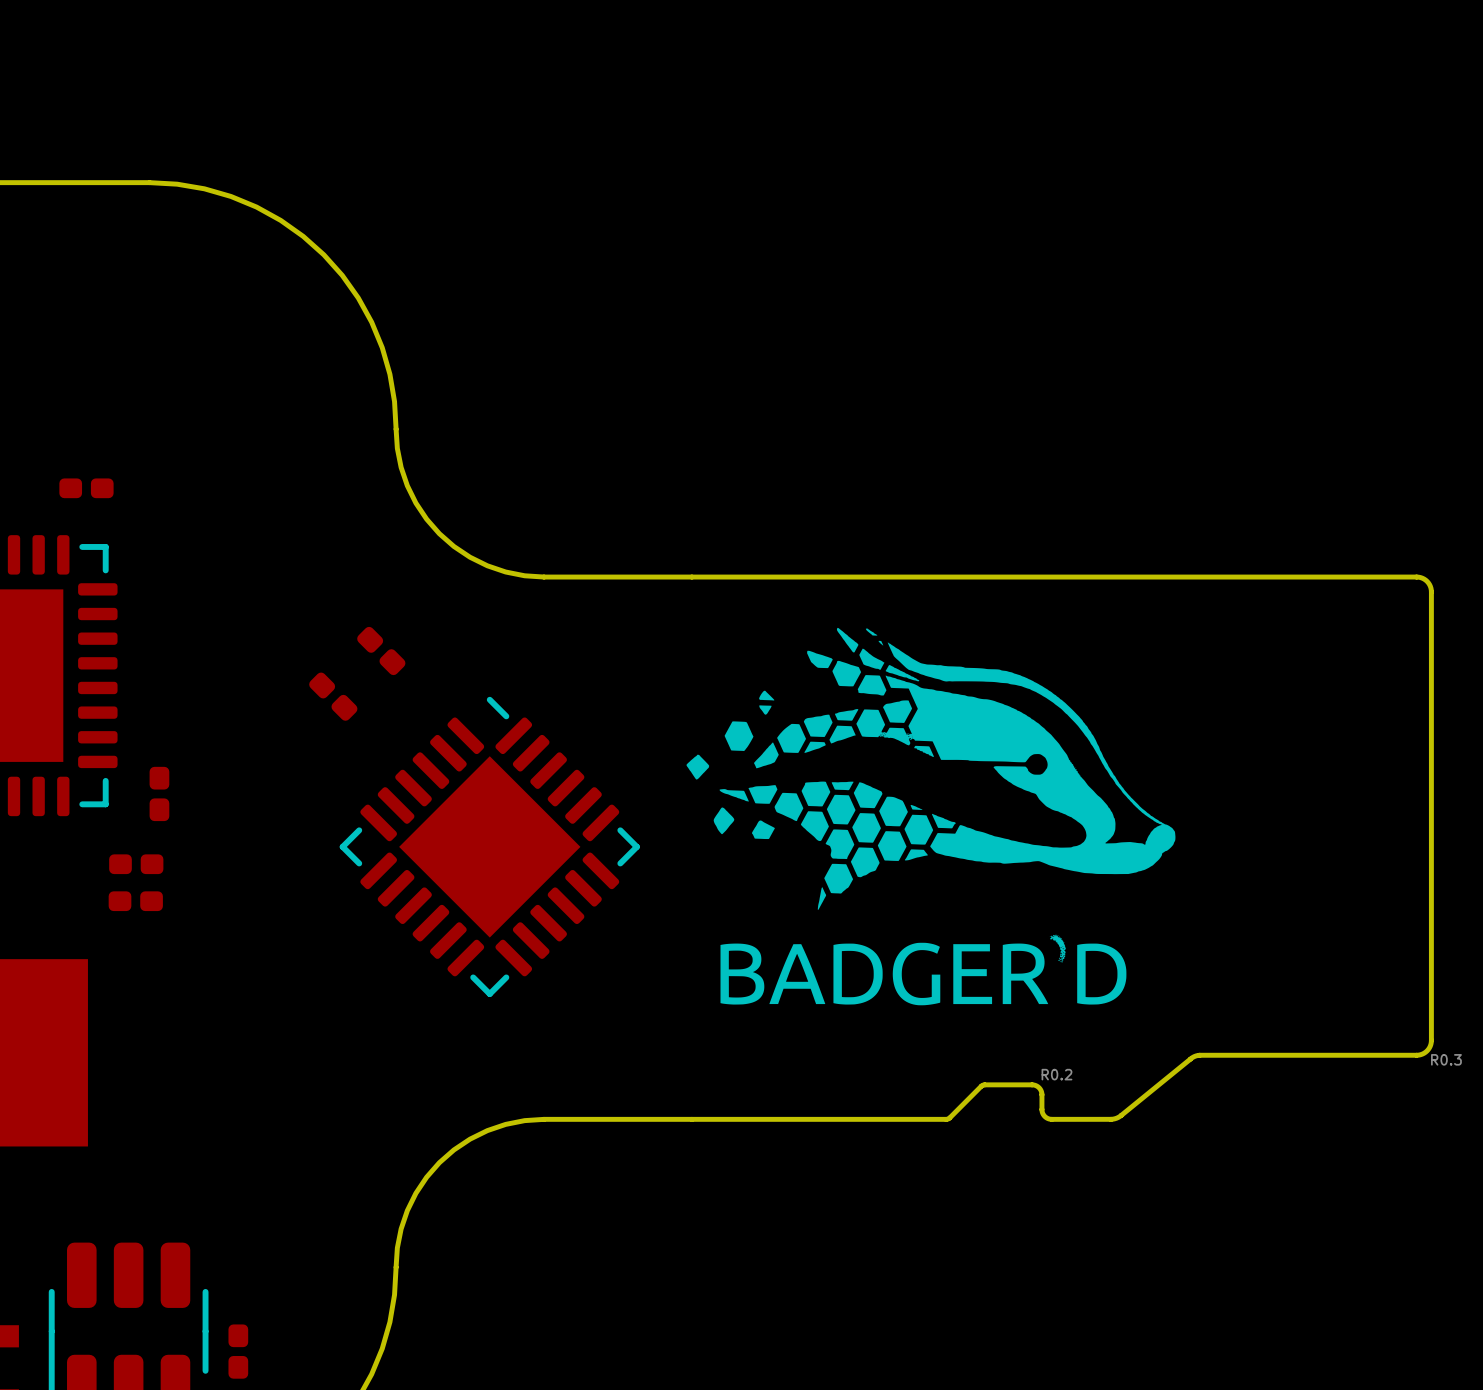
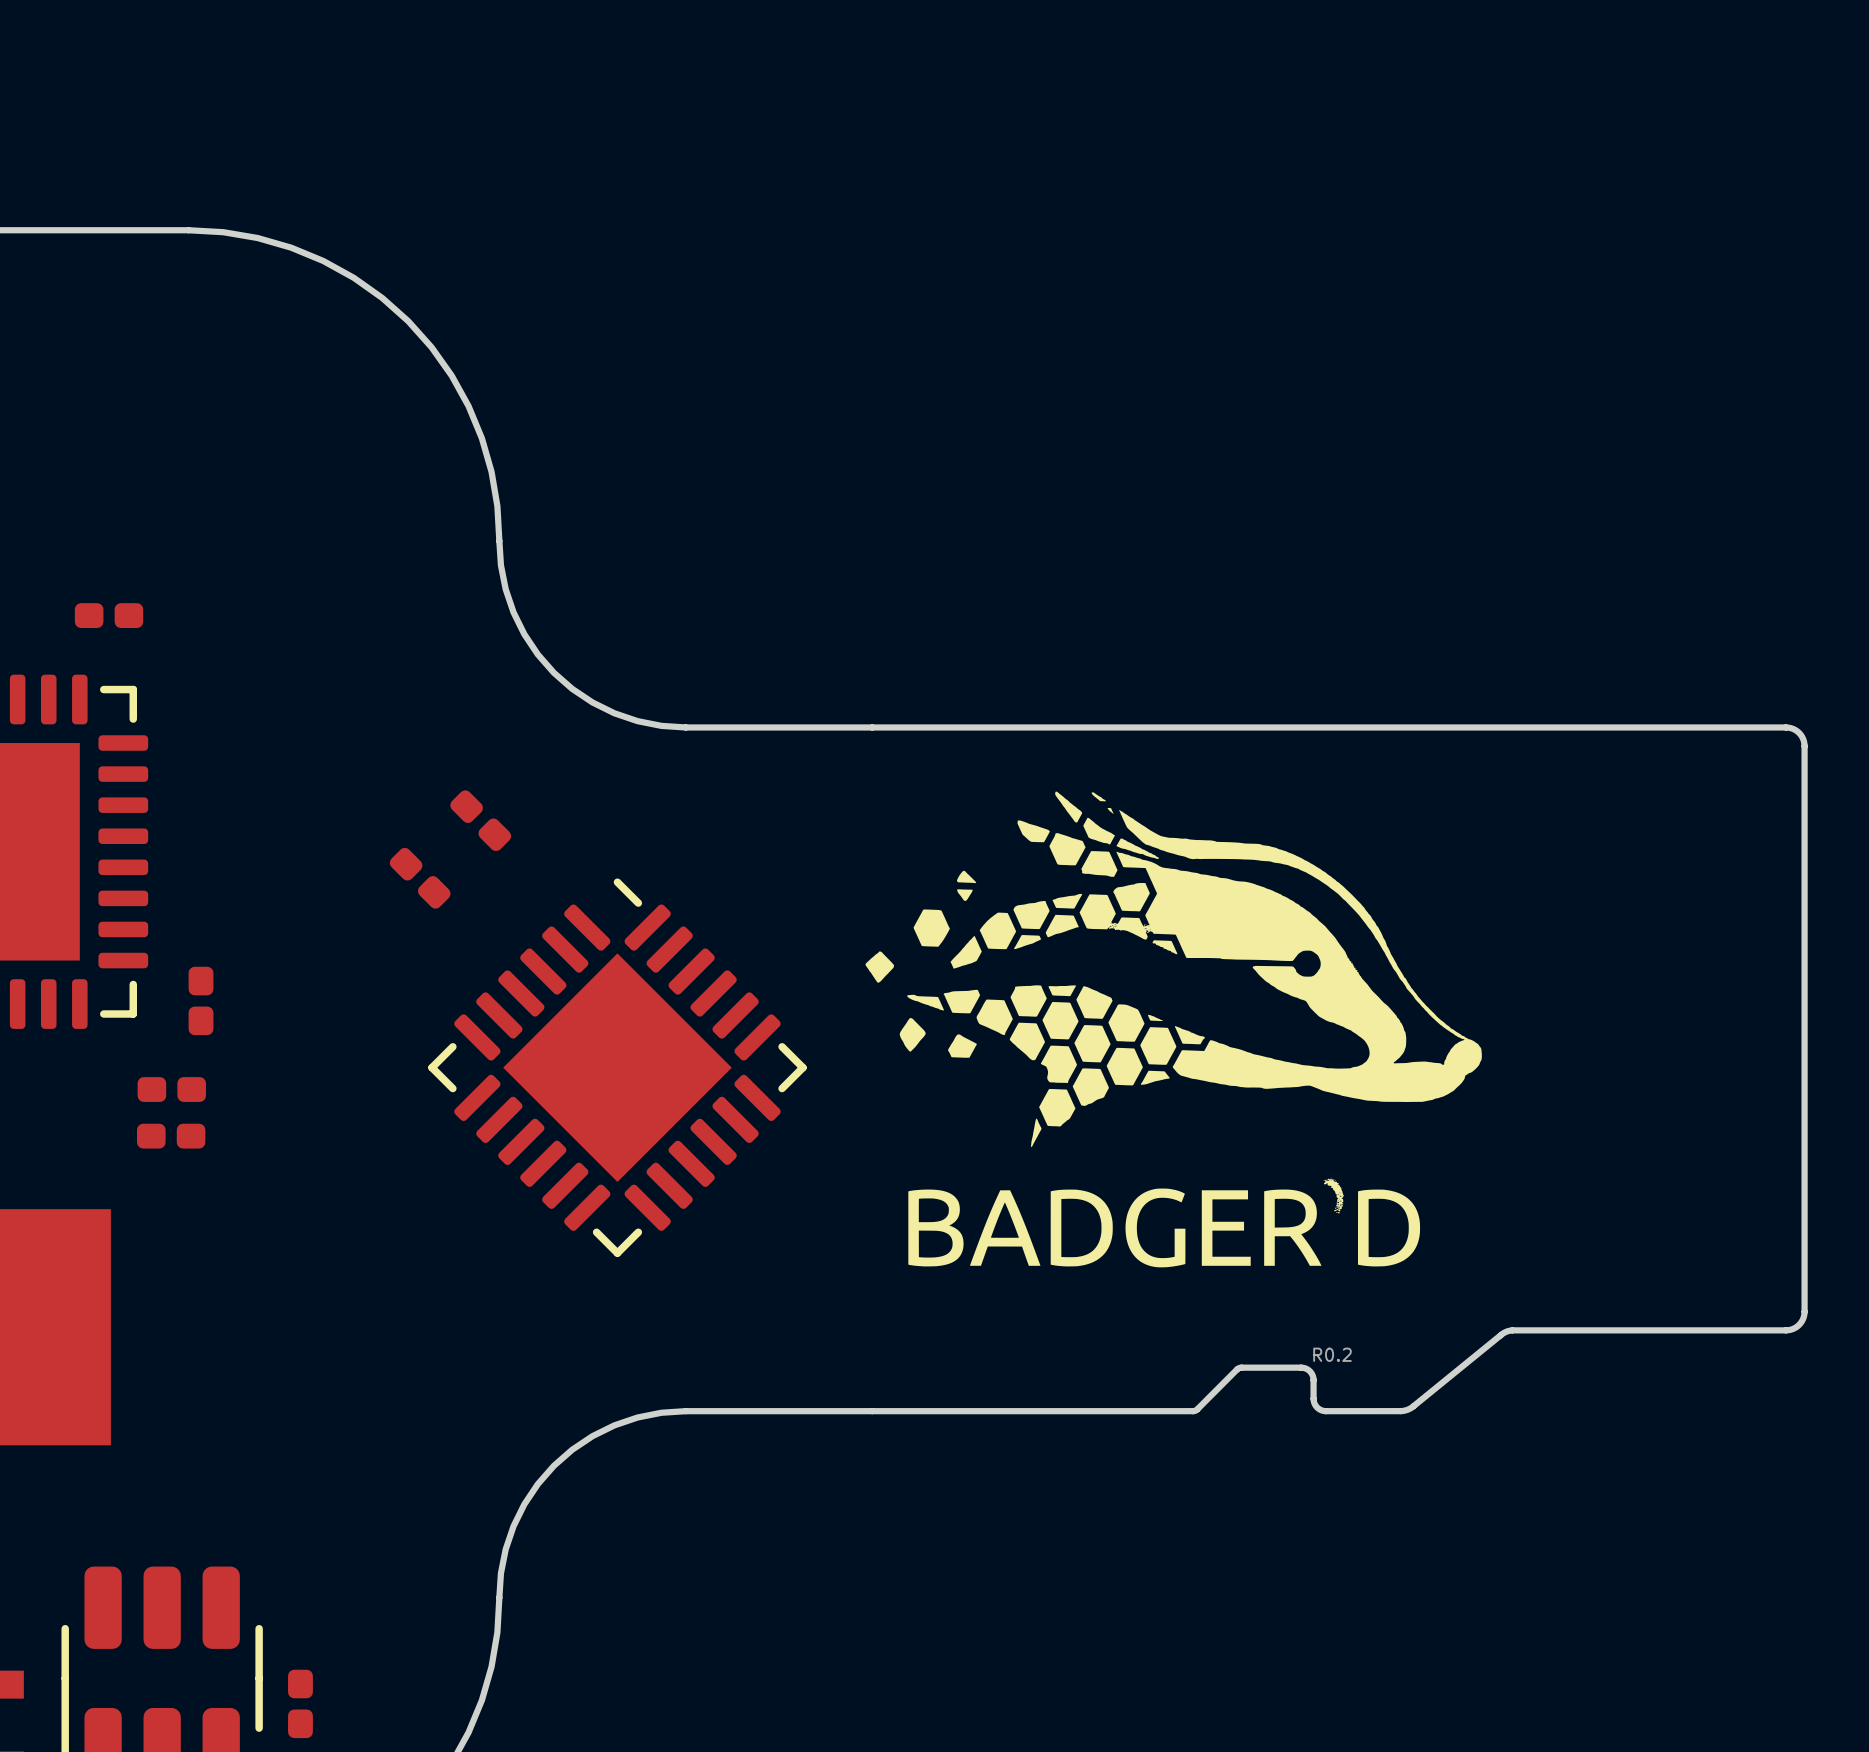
part text: R0.3 (1446, 1059) -> none

